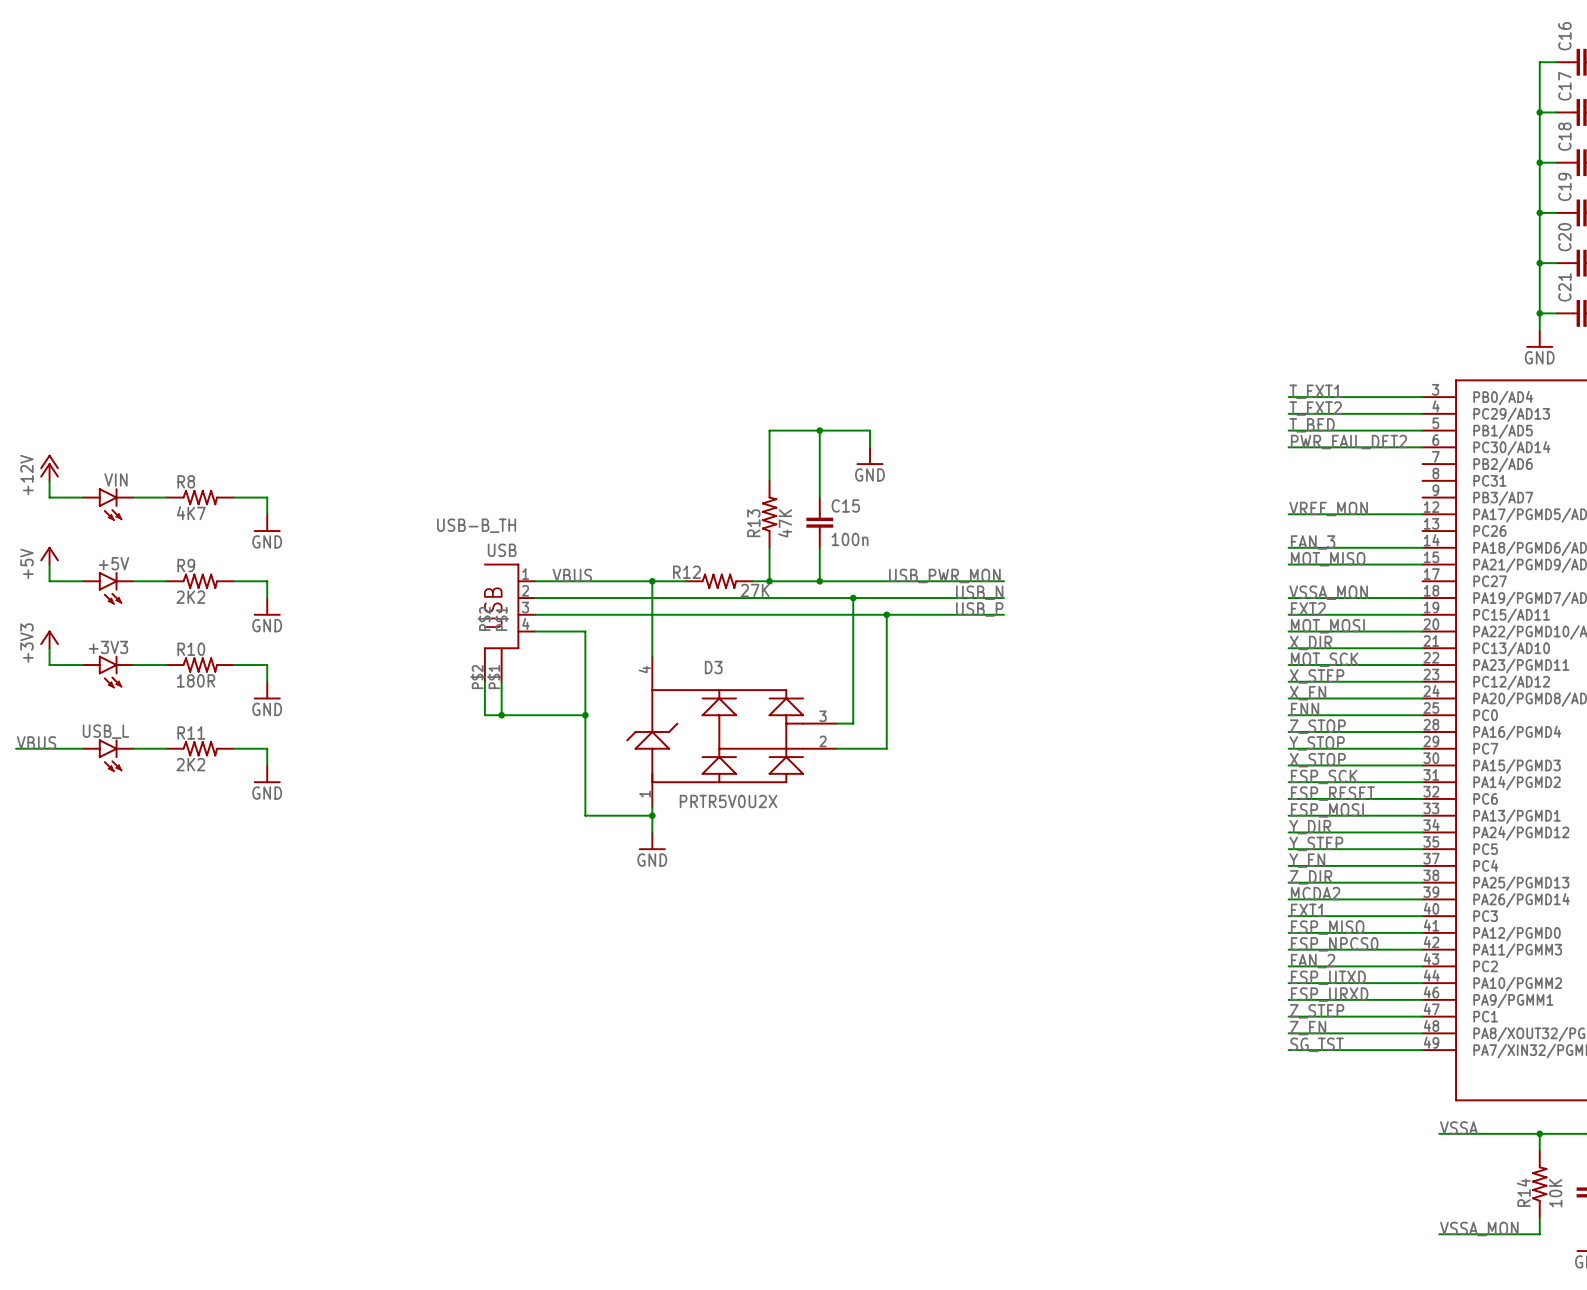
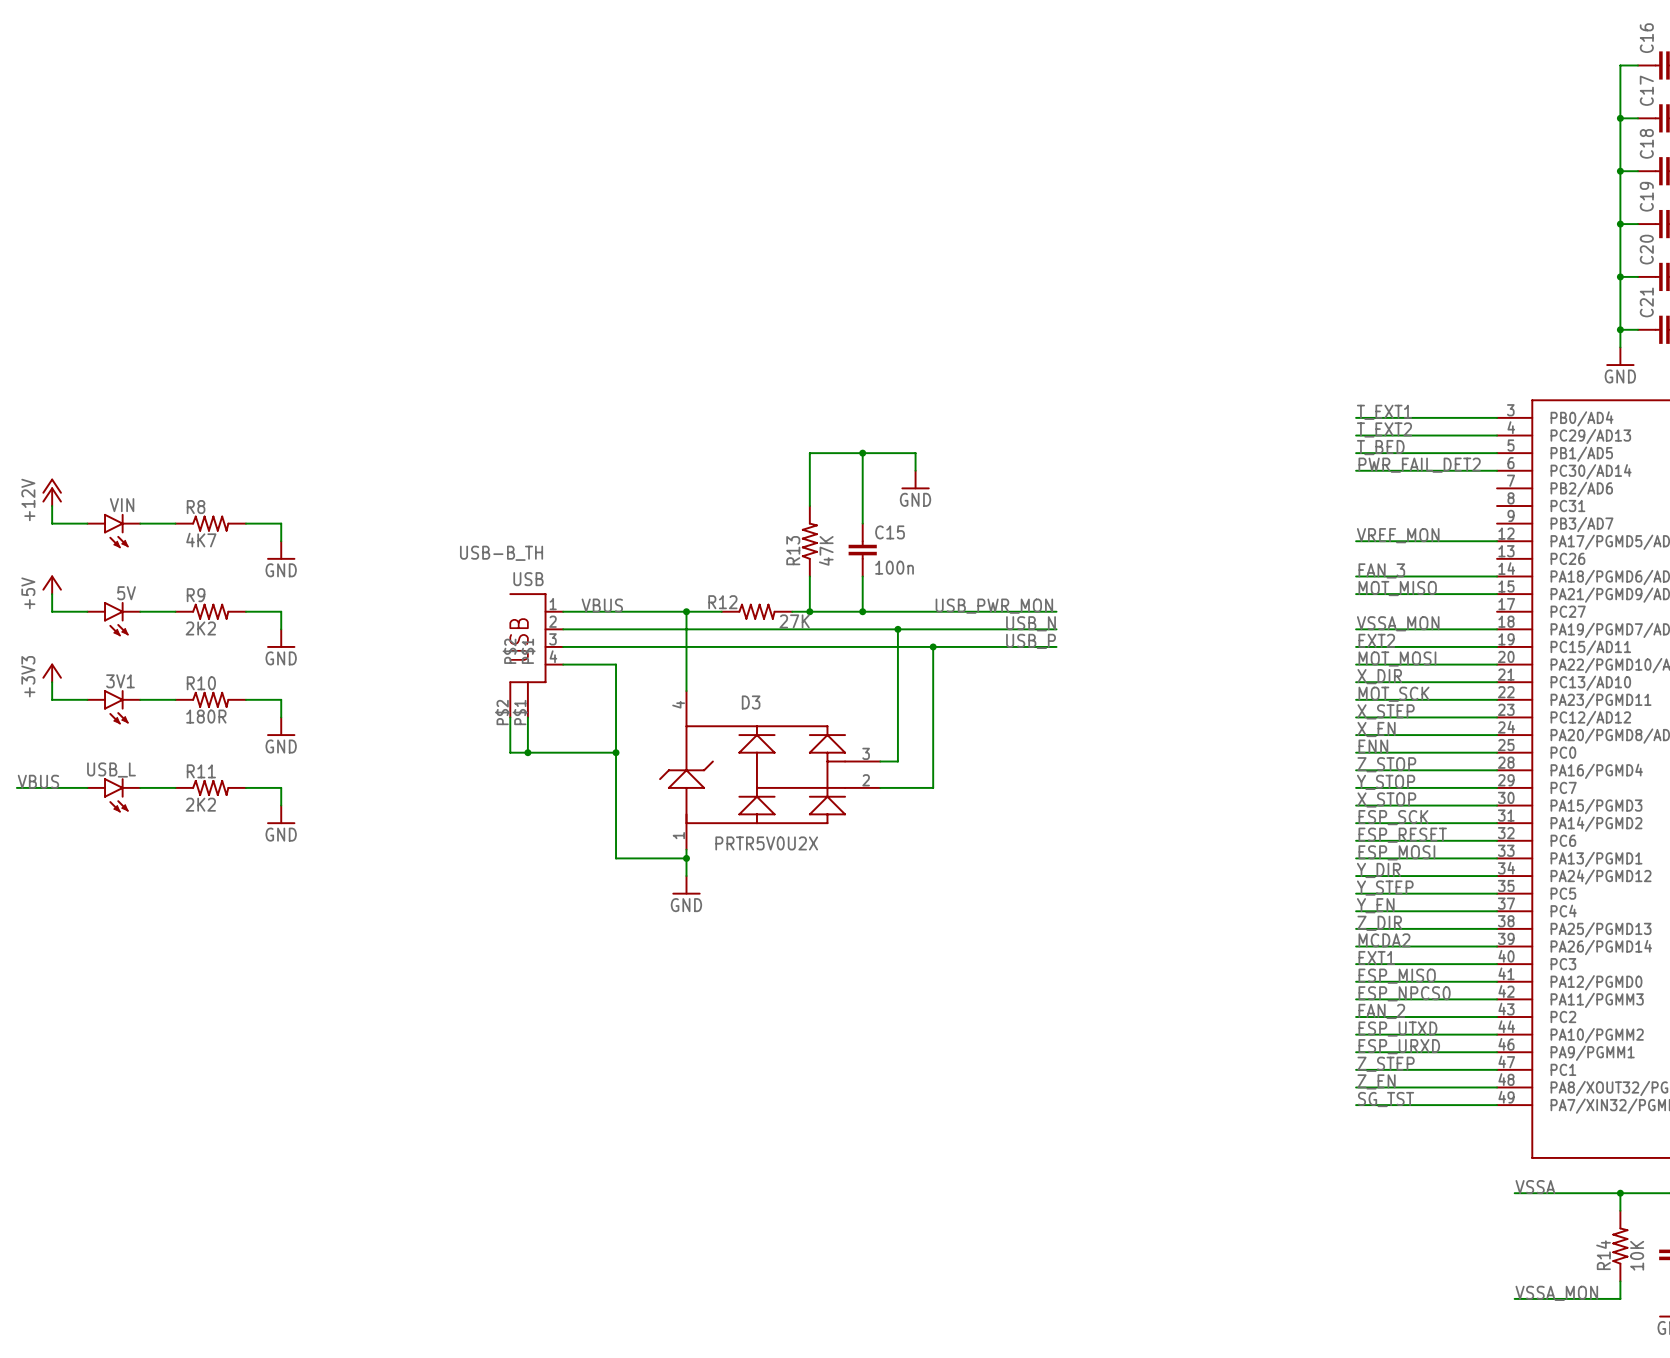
+5V name: +5V (113, 563) -> 5V (126, 593)
+3V3 name: +3V3 (108, 647) -> 3V1 (120, 681)

